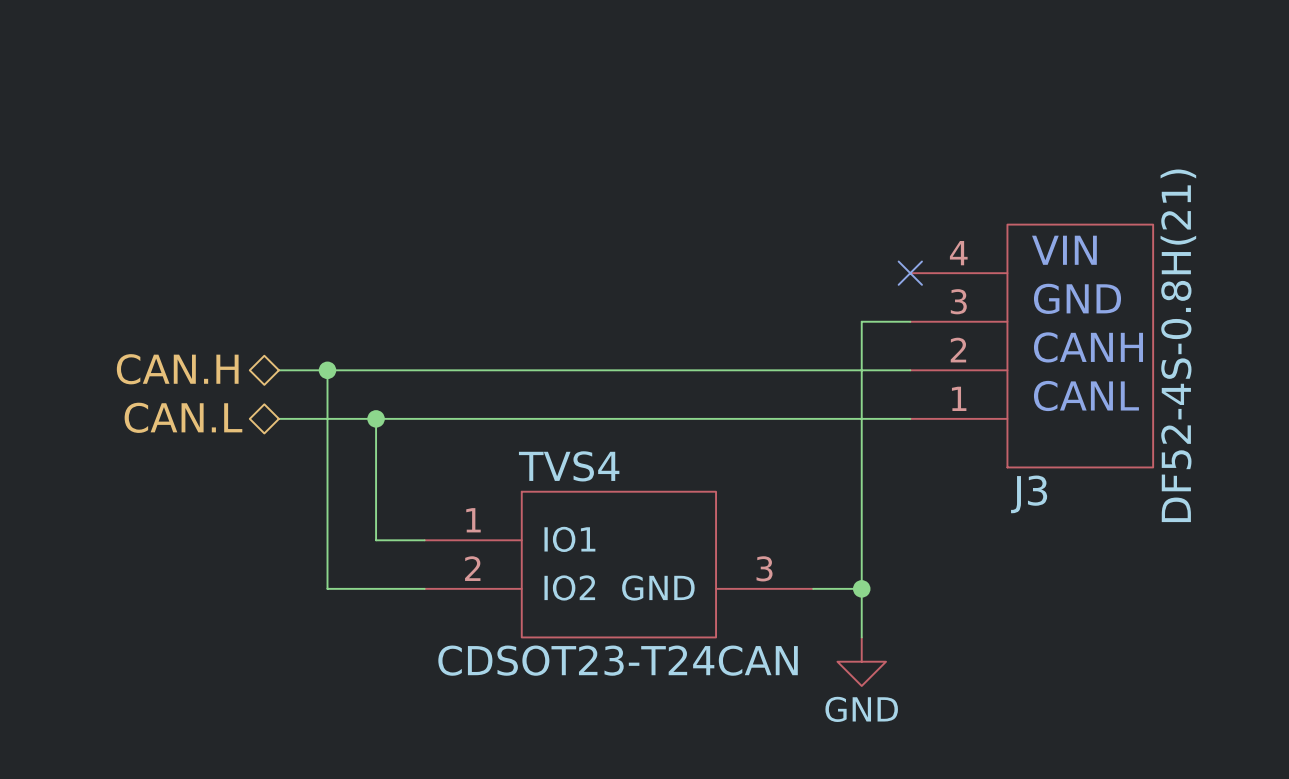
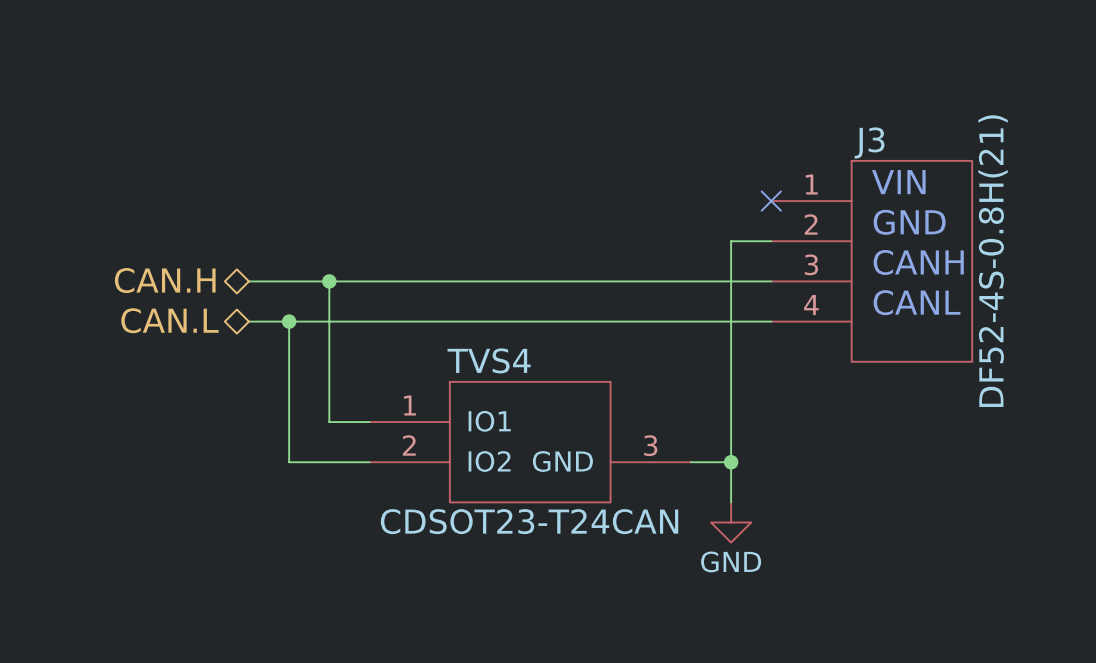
J3 flip: as is (1080, 346) -> up-down (911, 261)
wire: (327, 370) (327, 418) -> (329, 281) (329, 321)
junction: (327, 370) -> none
junction: none -> (329, 281)
junction: none -> (289, 321)
junction: (376, 418) -> none

